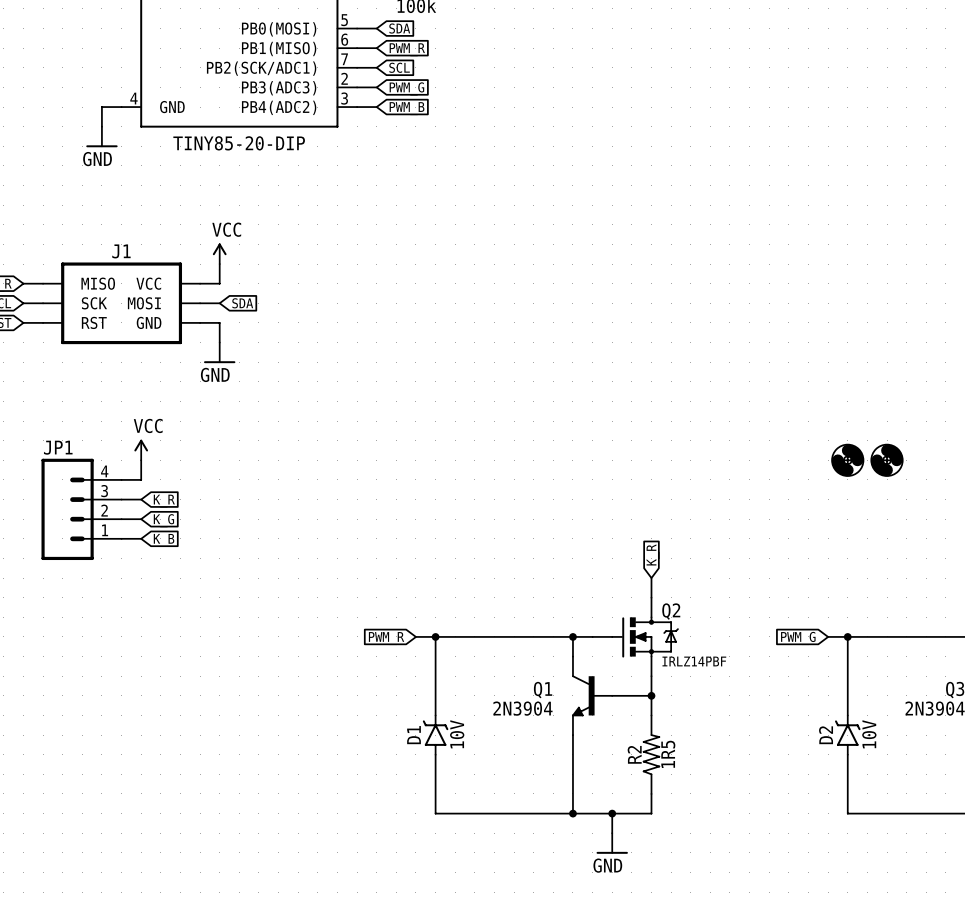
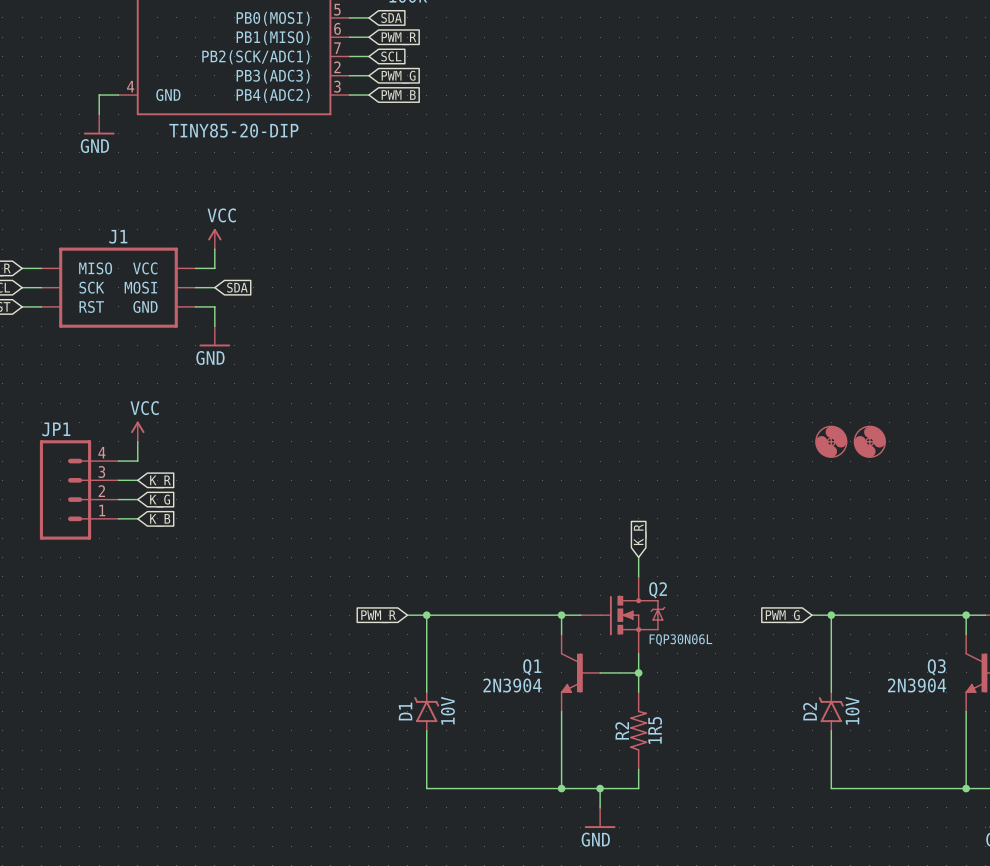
Q2 value: IRLZ14PBF (694, 661) -> FQP30N06L (680, 640)

